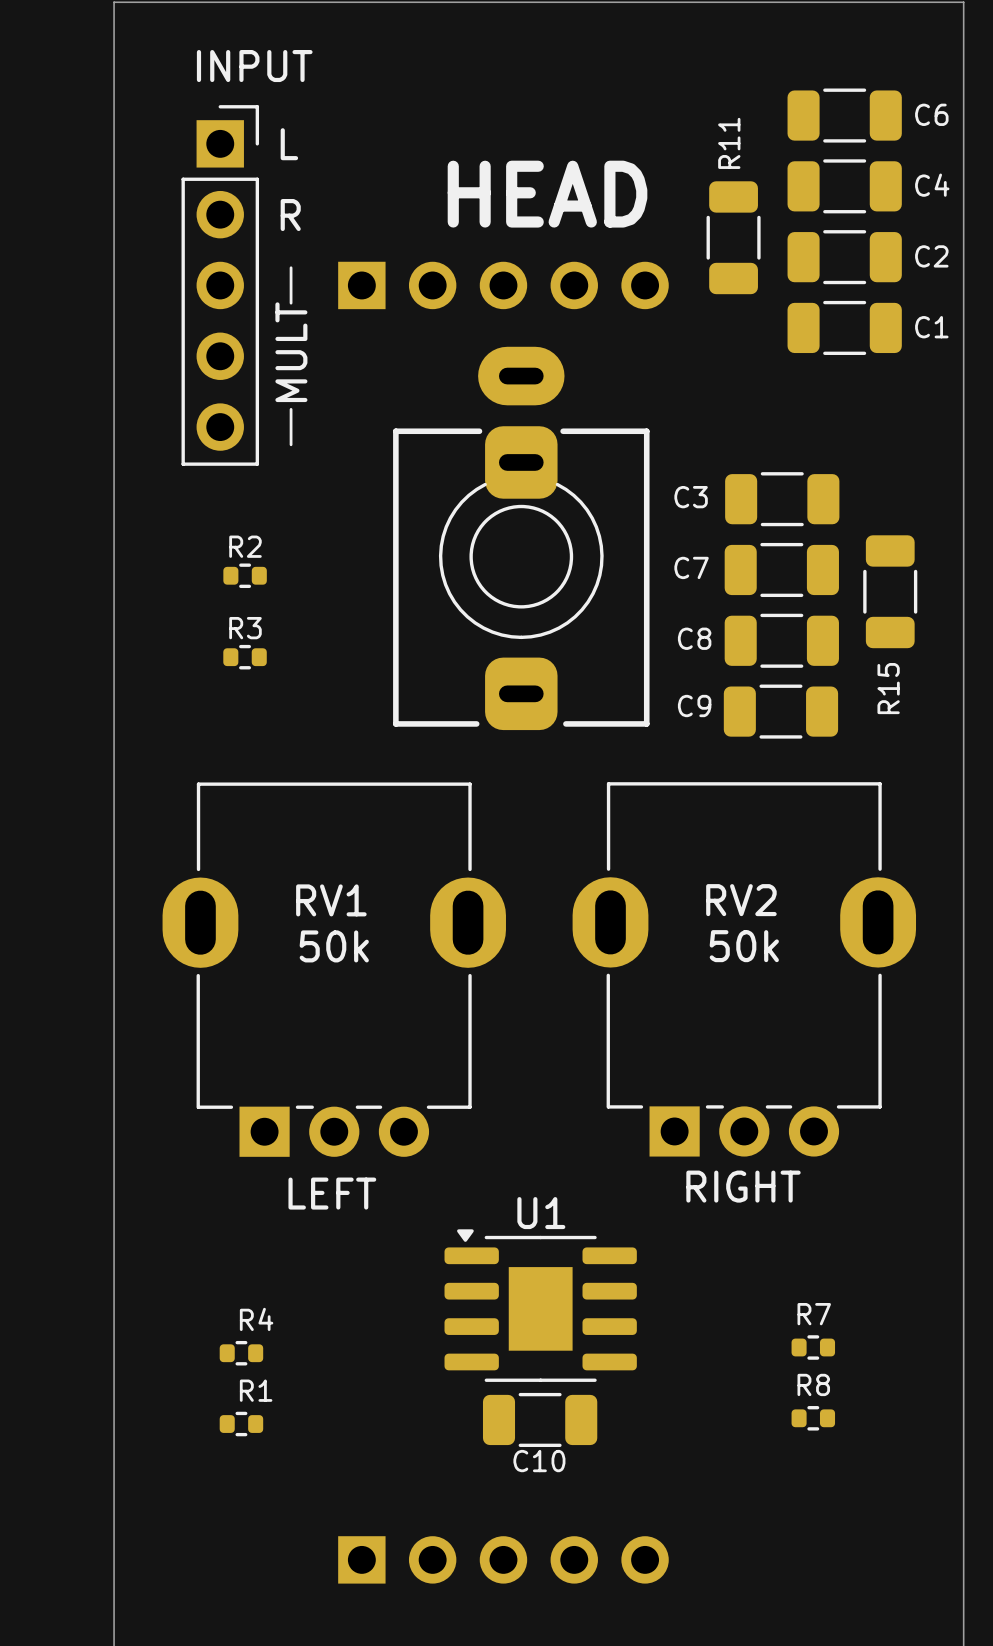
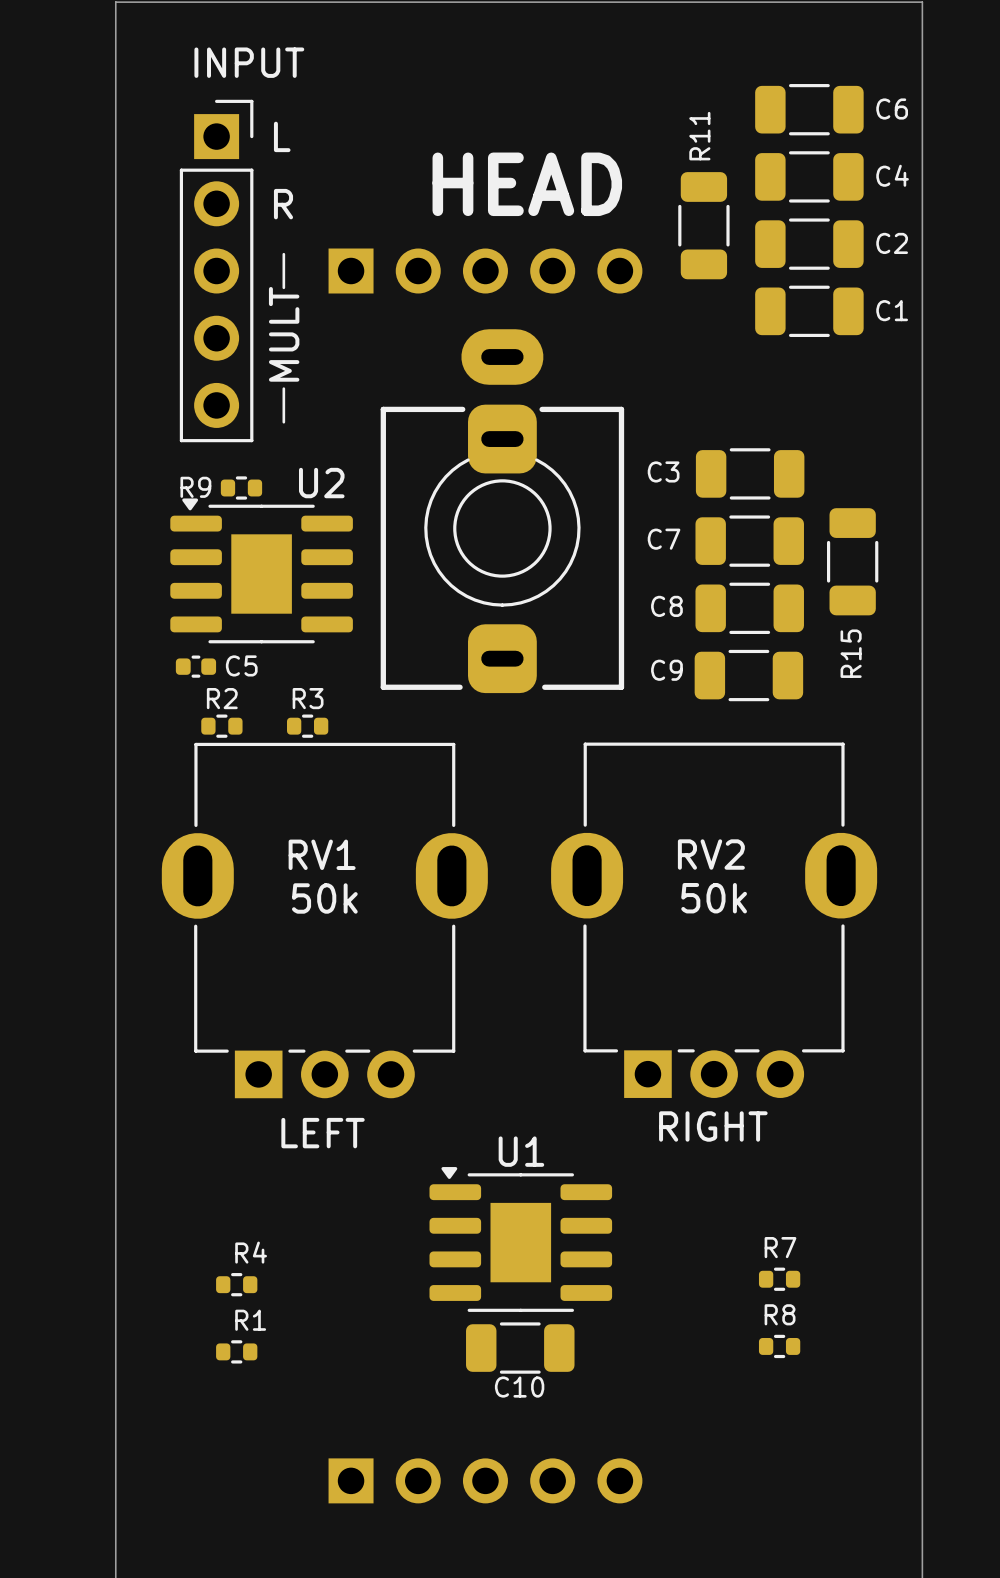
R9: none -> (241, 488)
R2 position: (245, 575) -> (221, 726)
U2: none -> (261, 570)
R3 position: (245, 657) -> (307, 726)
C5: none -> (195, 666)

